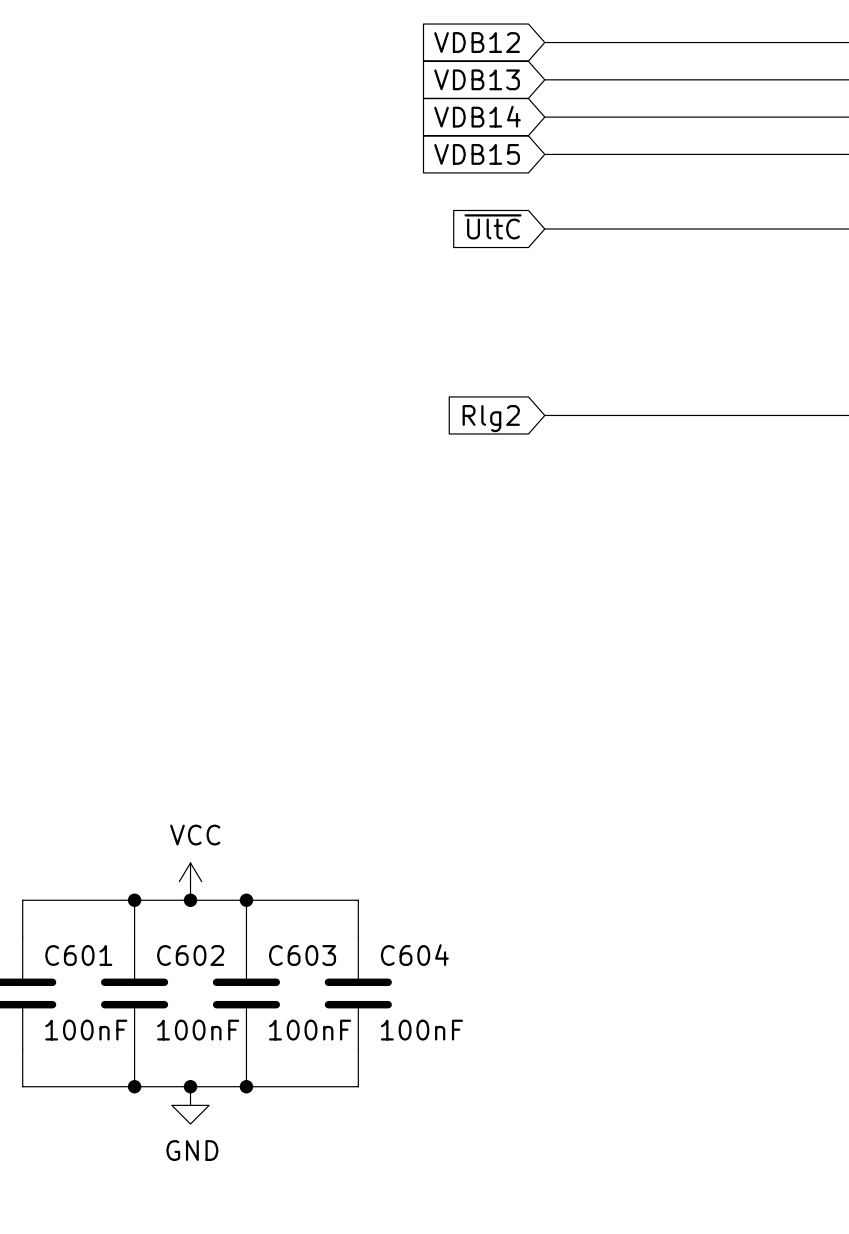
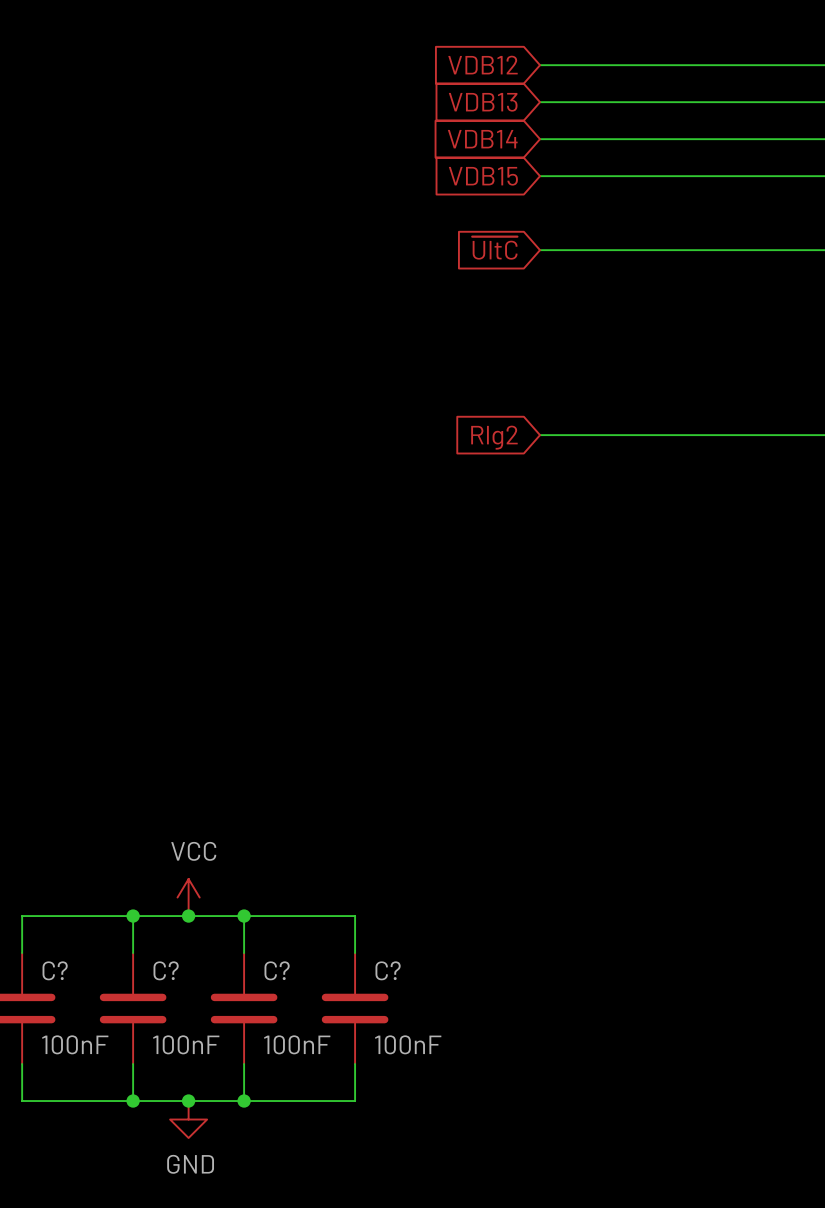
C601 name: C601 (78, 955) -> C? (55, 970)
C602 name: C602 (190, 955) -> C? (166, 970)
C603 name: C603 (302, 955) -> C? (277, 970)
C604 name: C604 (414, 955) -> C? (388, 970)

